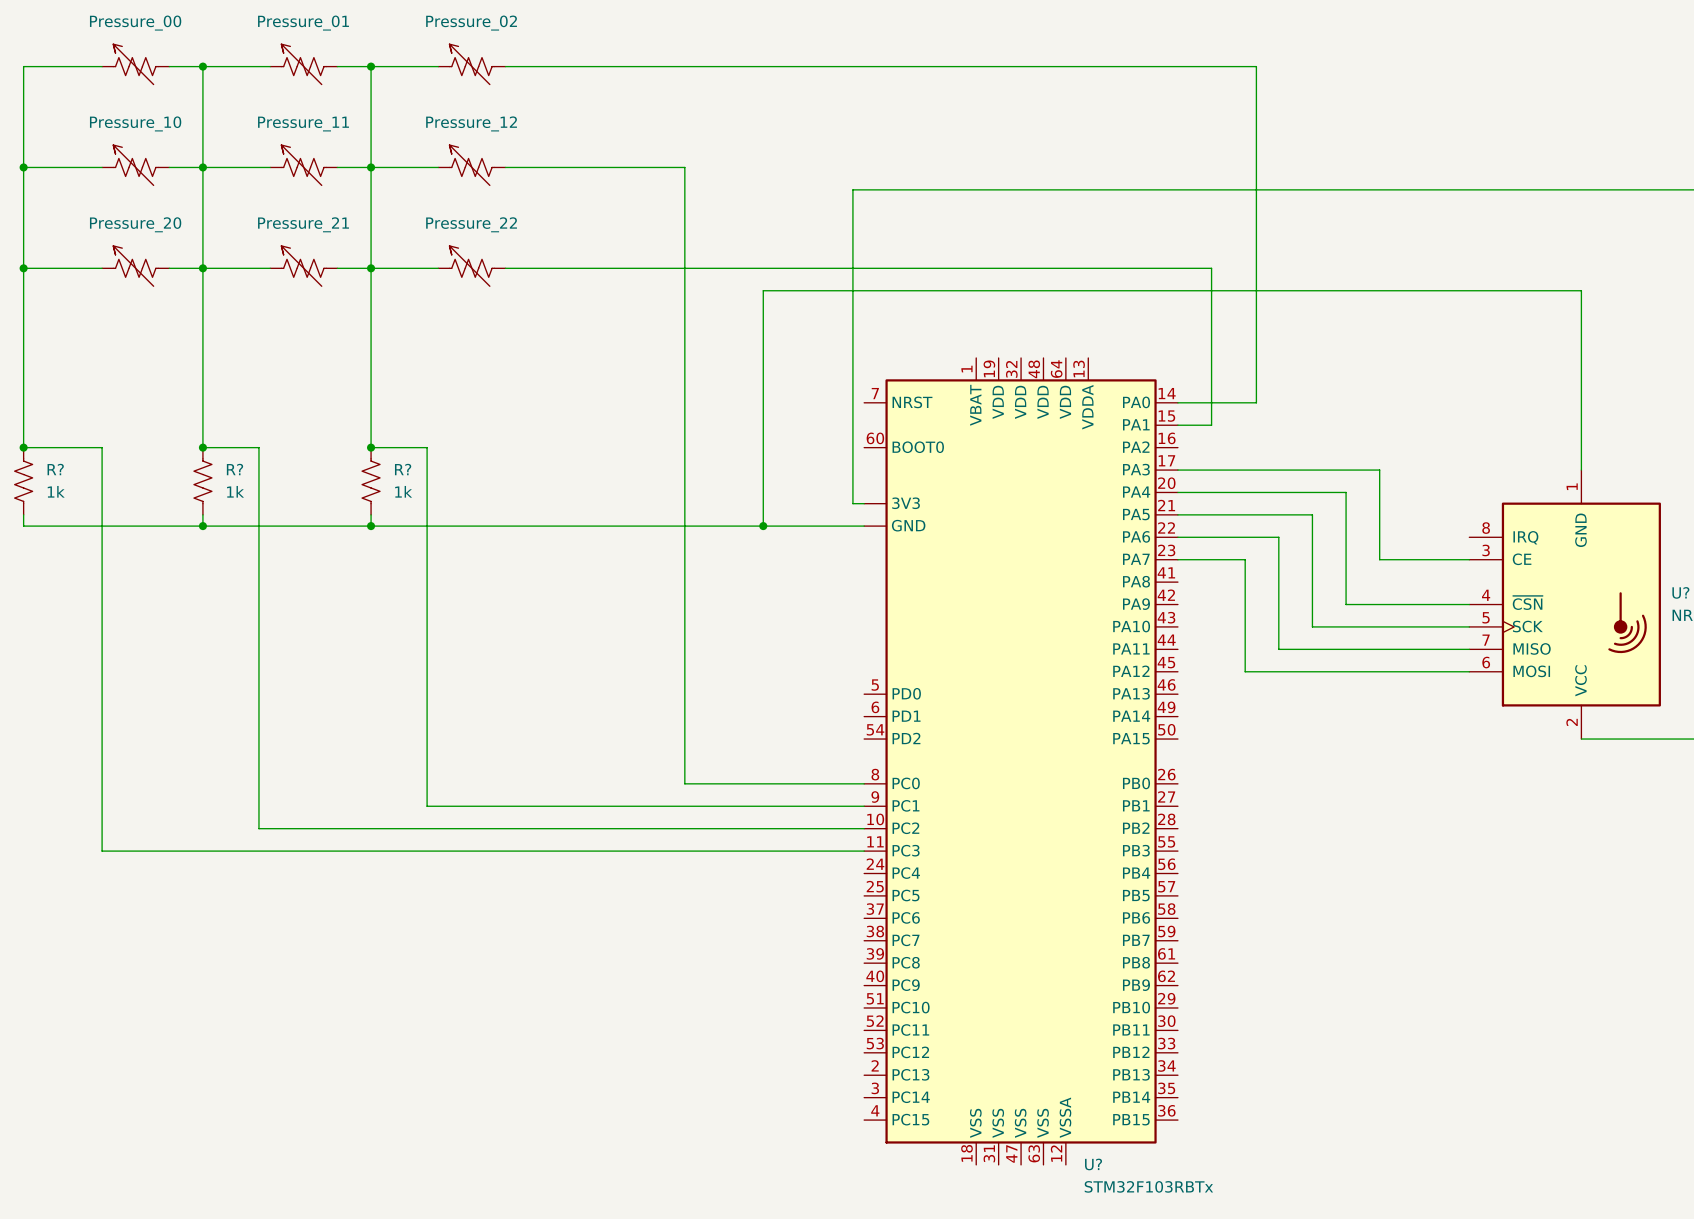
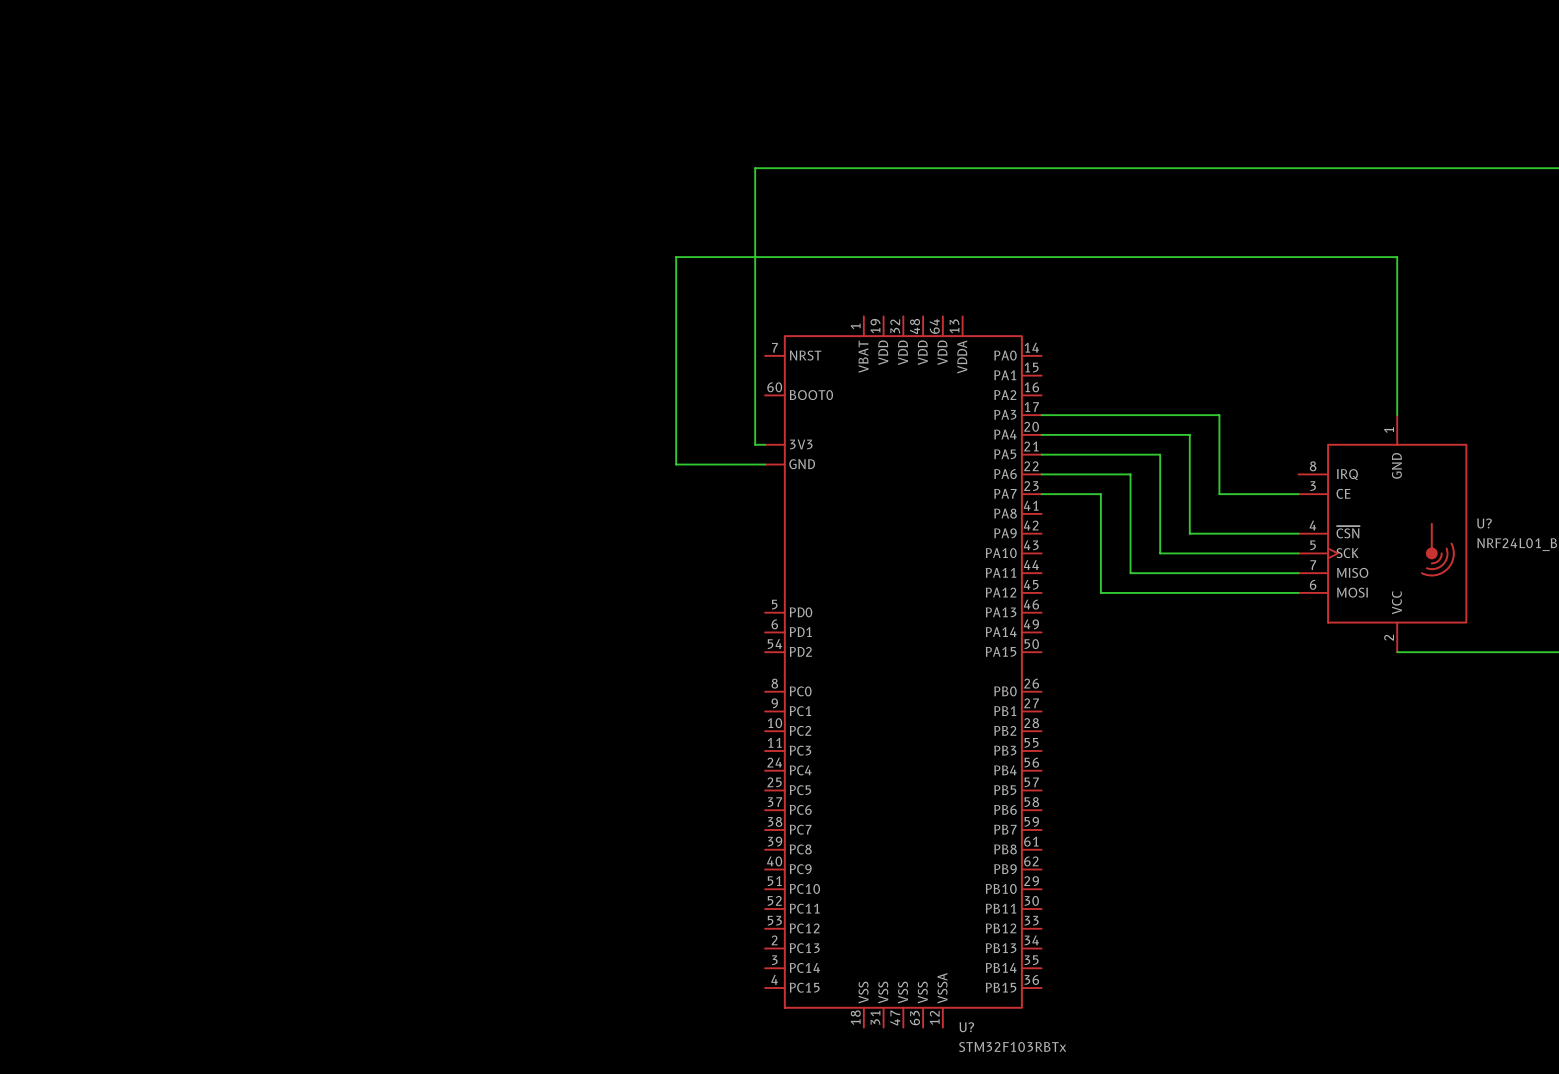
Pressure_00: (135, 64) -> none
Pressure_01: (303, 64) -> none
Pressure_02: (471, 64) -> none
wire: (102, 66) (23, 66) (23, 447) (102, 447) (102, 851) (864, 851) -> none
wire: (169, 66) (270, 66) -> none
wire: (202, 66) (202, 447) (258, 447) (258, 828) (864, 828) -> none
junction: (202, 66) -> none
wire: (337, 66) (438, 66) -> none
wire: (371, 66) (371, 447) (427, 447) (427, 806) (864, 806) -> none
junction: (371, 66) -> none
wire: (505, 66) (1256, 66) (1256, 402) (1177, 402) -> none
Pressure_10: (135, 165) -> none
Pressure_11: (303, 165) -> none
Pressure_12: (471, 165) -> none
wire: (23, 167) (102, 167) -> none
junction: (23, 167) -> none
wire: (169, 167) (270, 167) -> none
junction: (202, 167) -> none
wire: (337, 167) (438, 167) -> none
junction: (371, 167) -> none
wire: (505, 167) (684, 167) (684, 783) (864, 783) -> none
Pressure_20: (135, 266) -> none
Pressure_21: (303, 266) -> none
Pressure_22: (471, 266) -> none
wire: (23, 268) (102, 268) -> none
junction: (23, 268) -> none
wire: (169, 268) (270, 268) -> none
junction: (202, 268) -> none
wire: (337, 268) (438, 268) -> none
junction: (371, 268) -> none
wire: (505, 268) (1211, 268) (1211, 425) (1177, 425) -> none
junction: (23, 447) -> none
junction: (202, 447) -> none
junction: (371, 447) -> none
R?: 1k (23, 481) -> none
R?: 1k (202, 481) -> none
R?: 1k (371, 481) -> none
wire: (23, 514) (23, 526) (763, 526) -> none
wire: (202, 514) (202, 526) -> none
wire: (371, 514) (371, 526) -> none
junction: (202, 526) -> none
junction: (371, 526) -> none
junction: (763, 526) -> none

